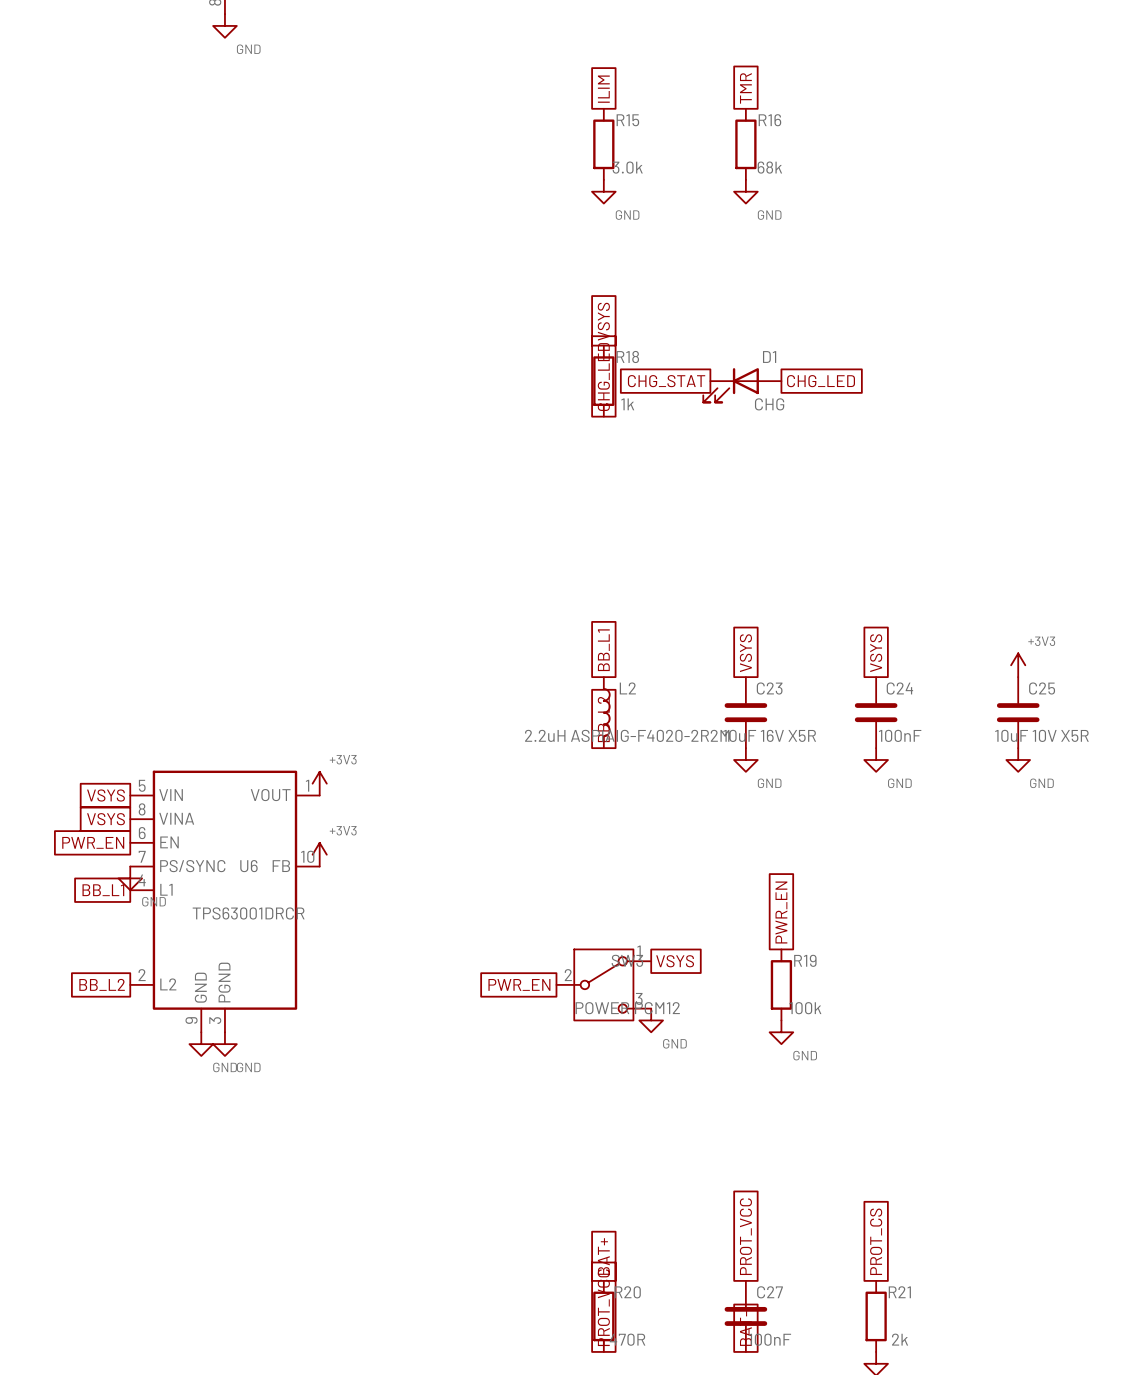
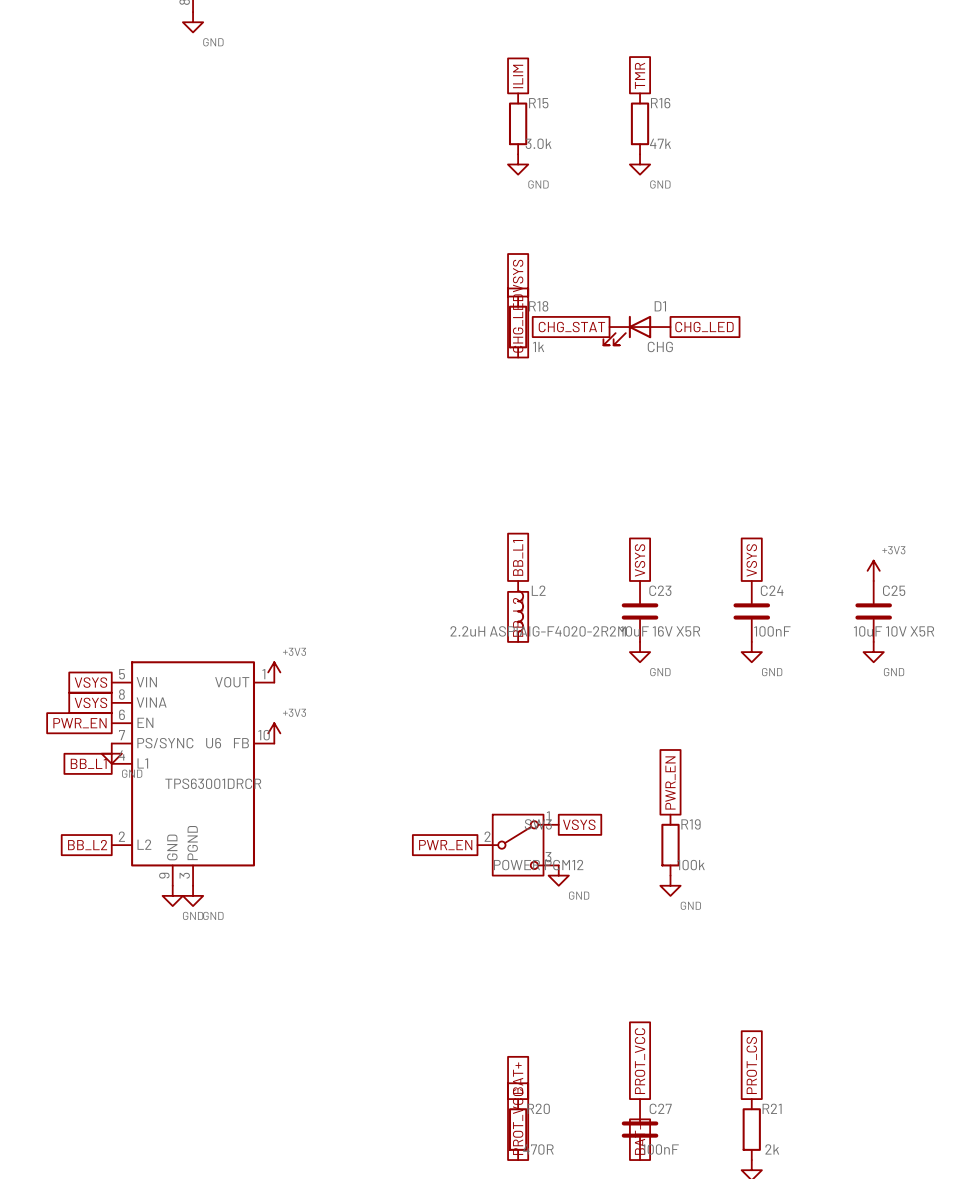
R16 value: 68k (769, 167) -> 47k (660, 143)

